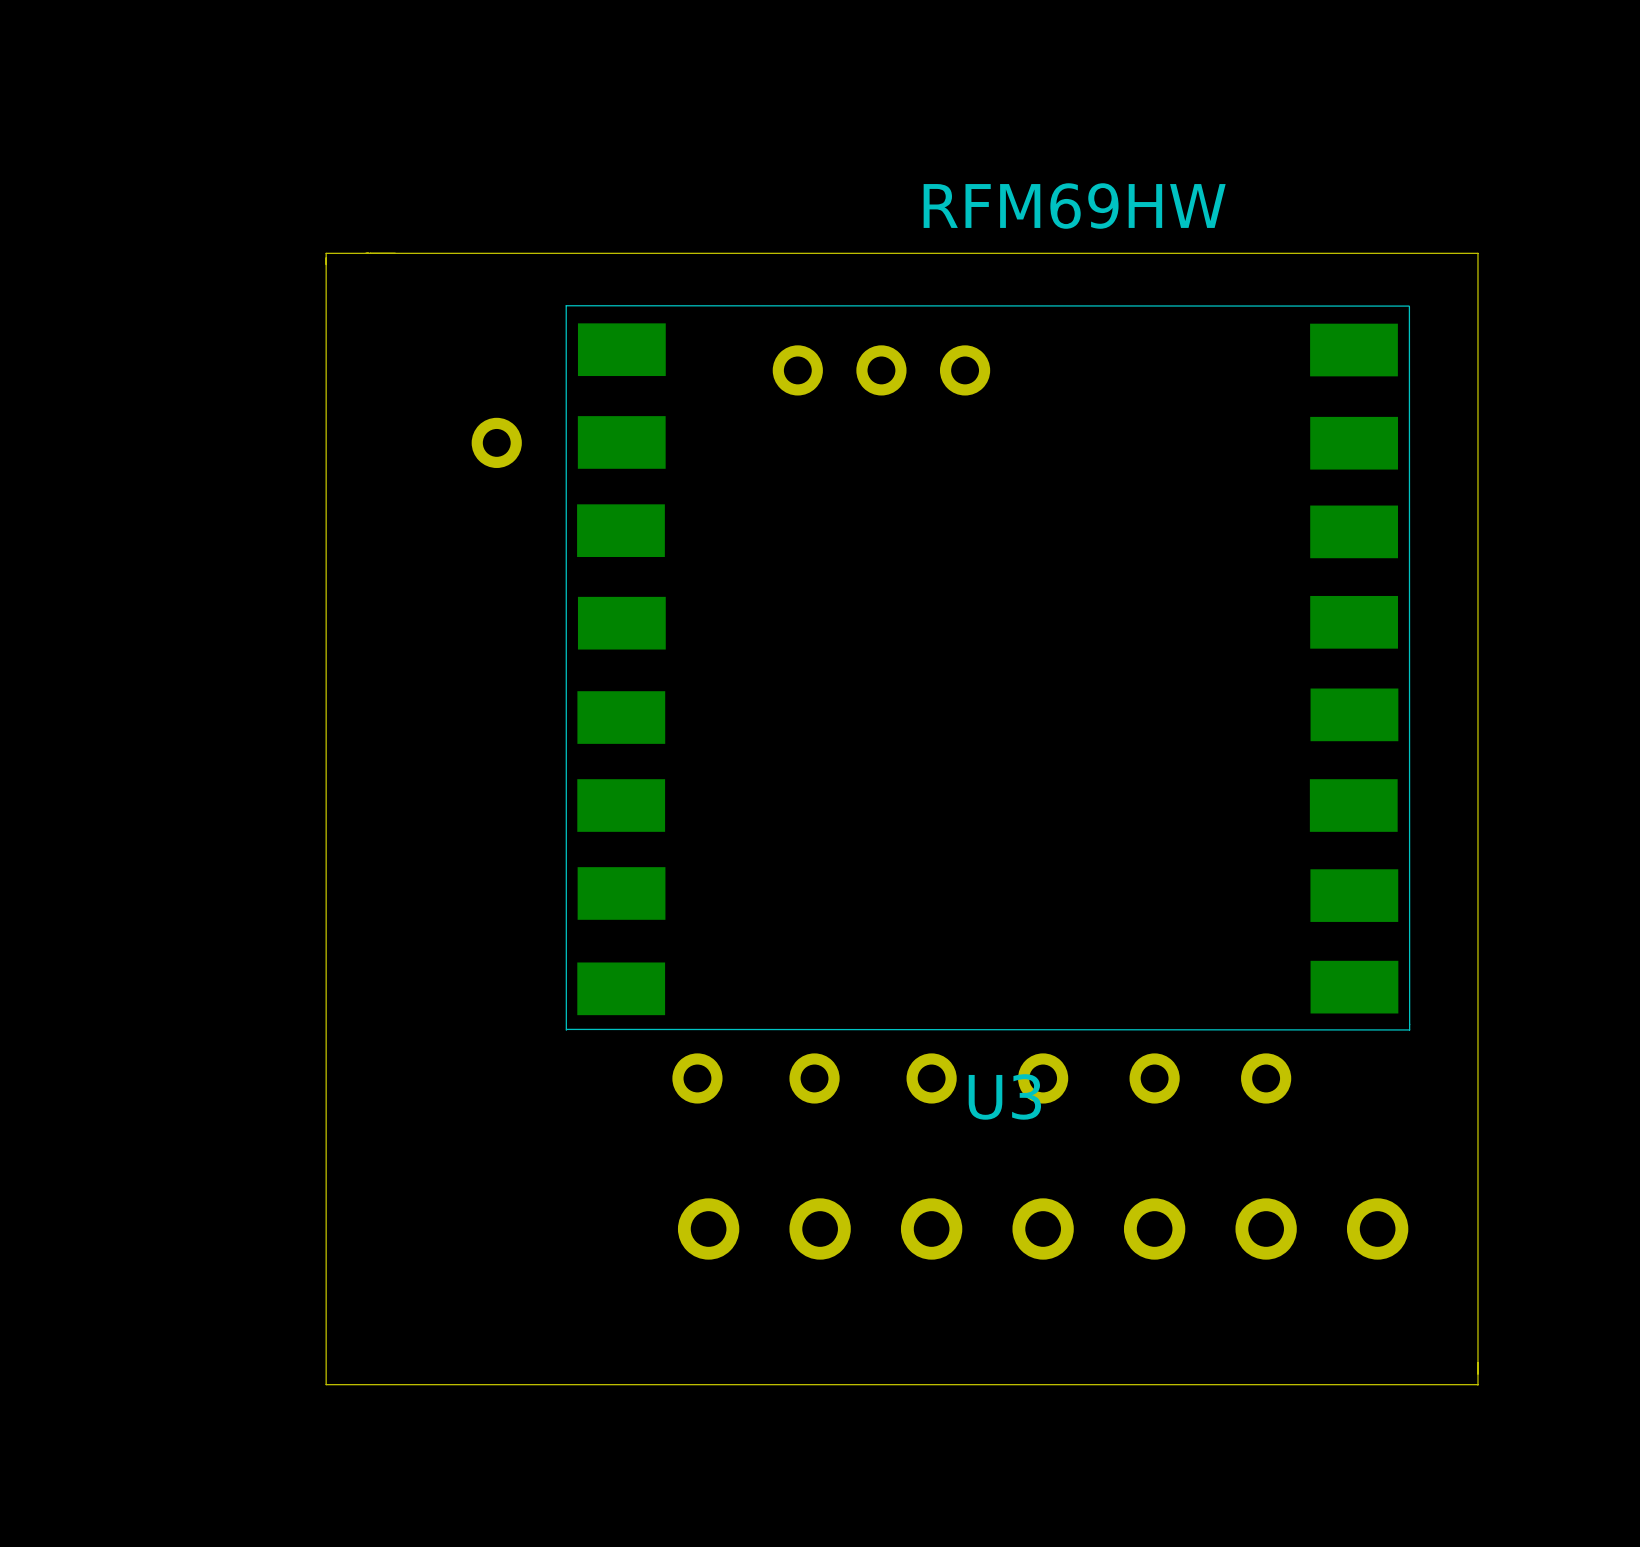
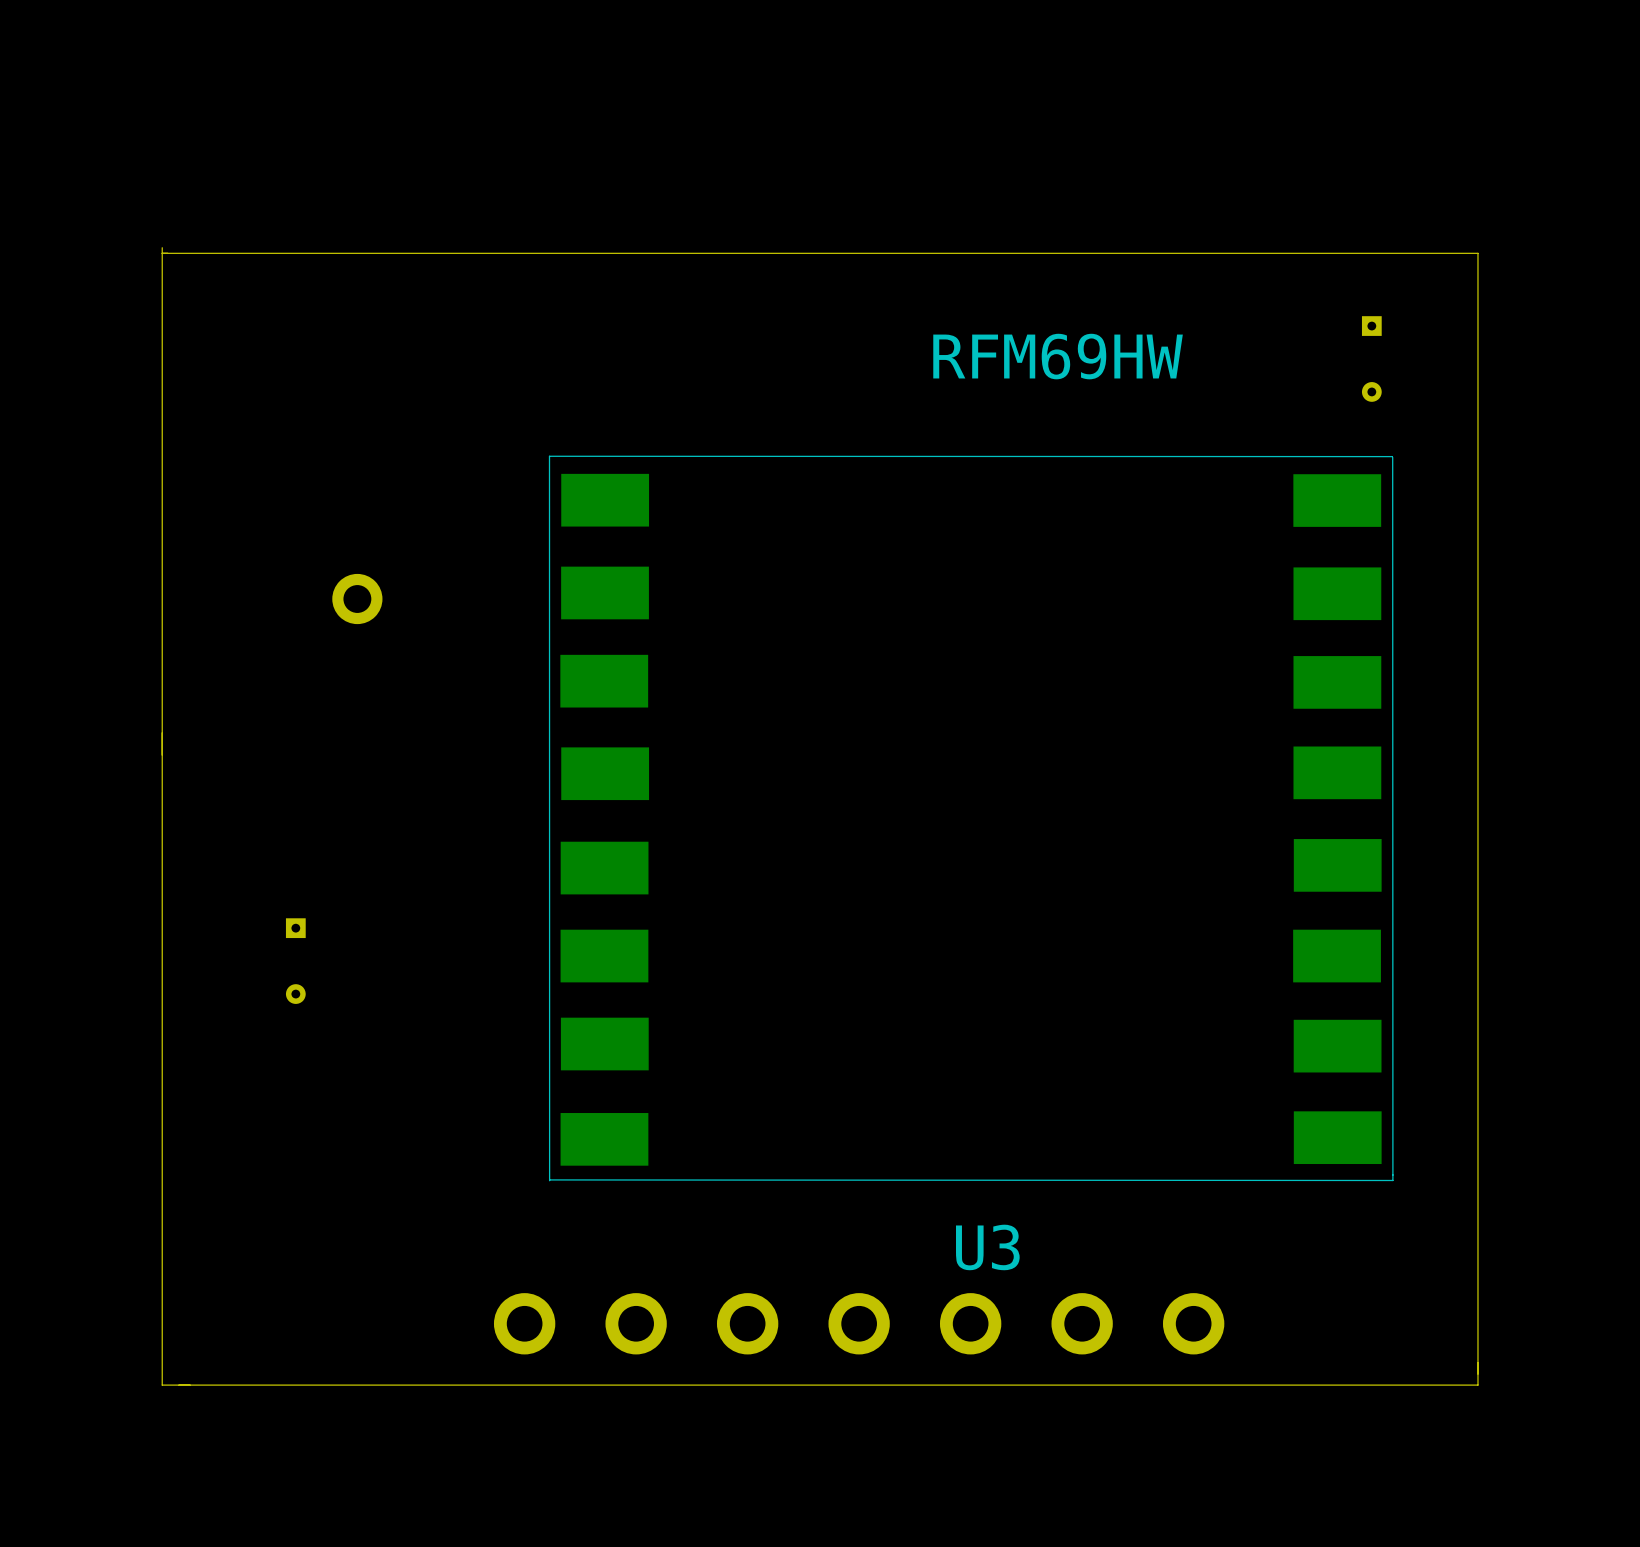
board edge: (326, 253) (326, 1384) (1477, 1384) -> (162, 247) (162, 1385) (1477, 1385)
board edge: none -> (326, 253) (162, 253)
part: none -> (1371, 358)
part: (797, 370) -> none
part: (881, 370) -> none
part: (965, 370) -> none
part position: (496, 442) -> (357, 599)
U3 position: (987, 667) -> (971, 818)
part: none -> (295, 961)
part: (697, 1078) -> none
part: (814, 1078) -> none
part: (931, 1078) -> none
part: (1043, 1078) -> none
part: (1154, 1078) -> none
part: (1266, 1078) -> none
part position: (1043, 1229) -> (859, 1323)

